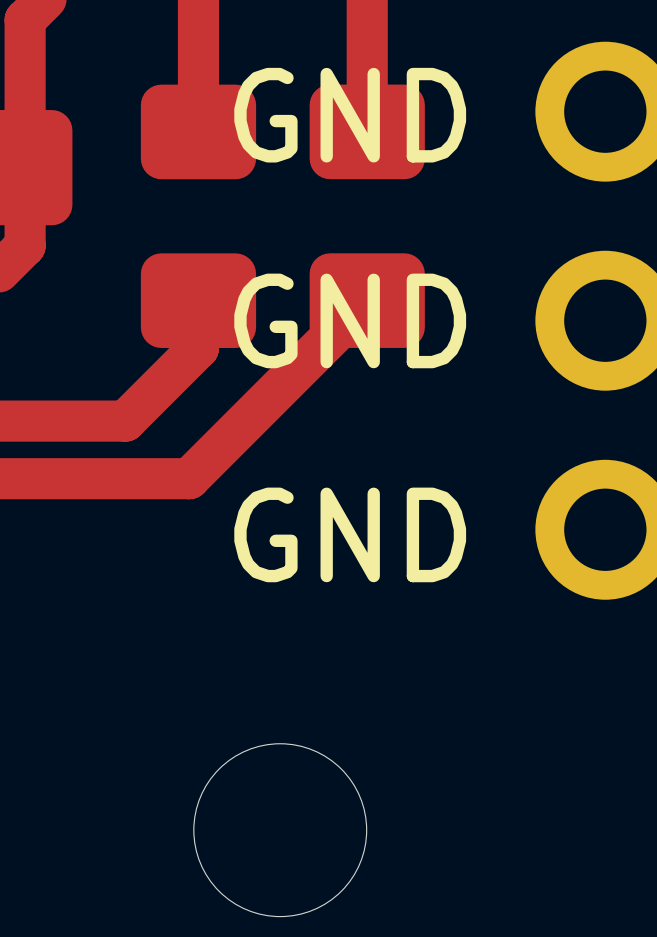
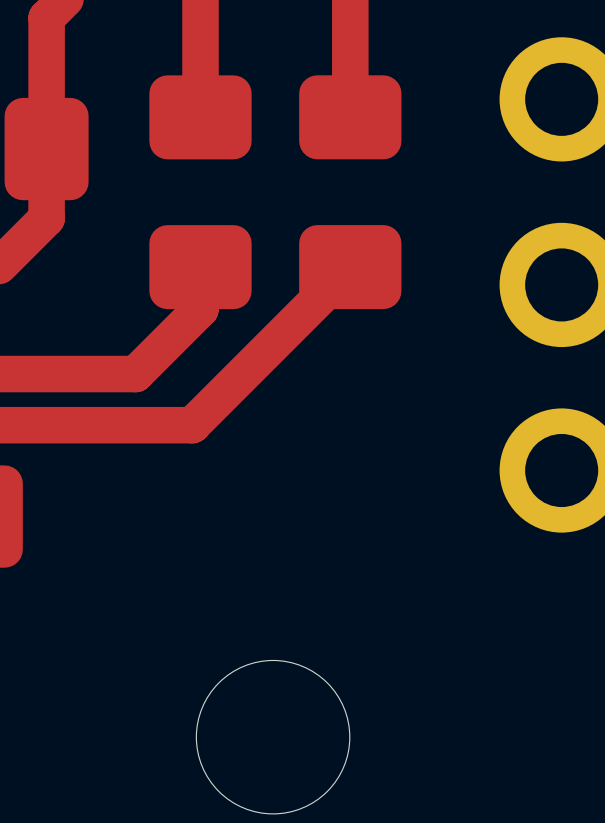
text: GND (350, 115) -> none
text: GND (350, 320) -> none
text: GND (350, 534) -> none

